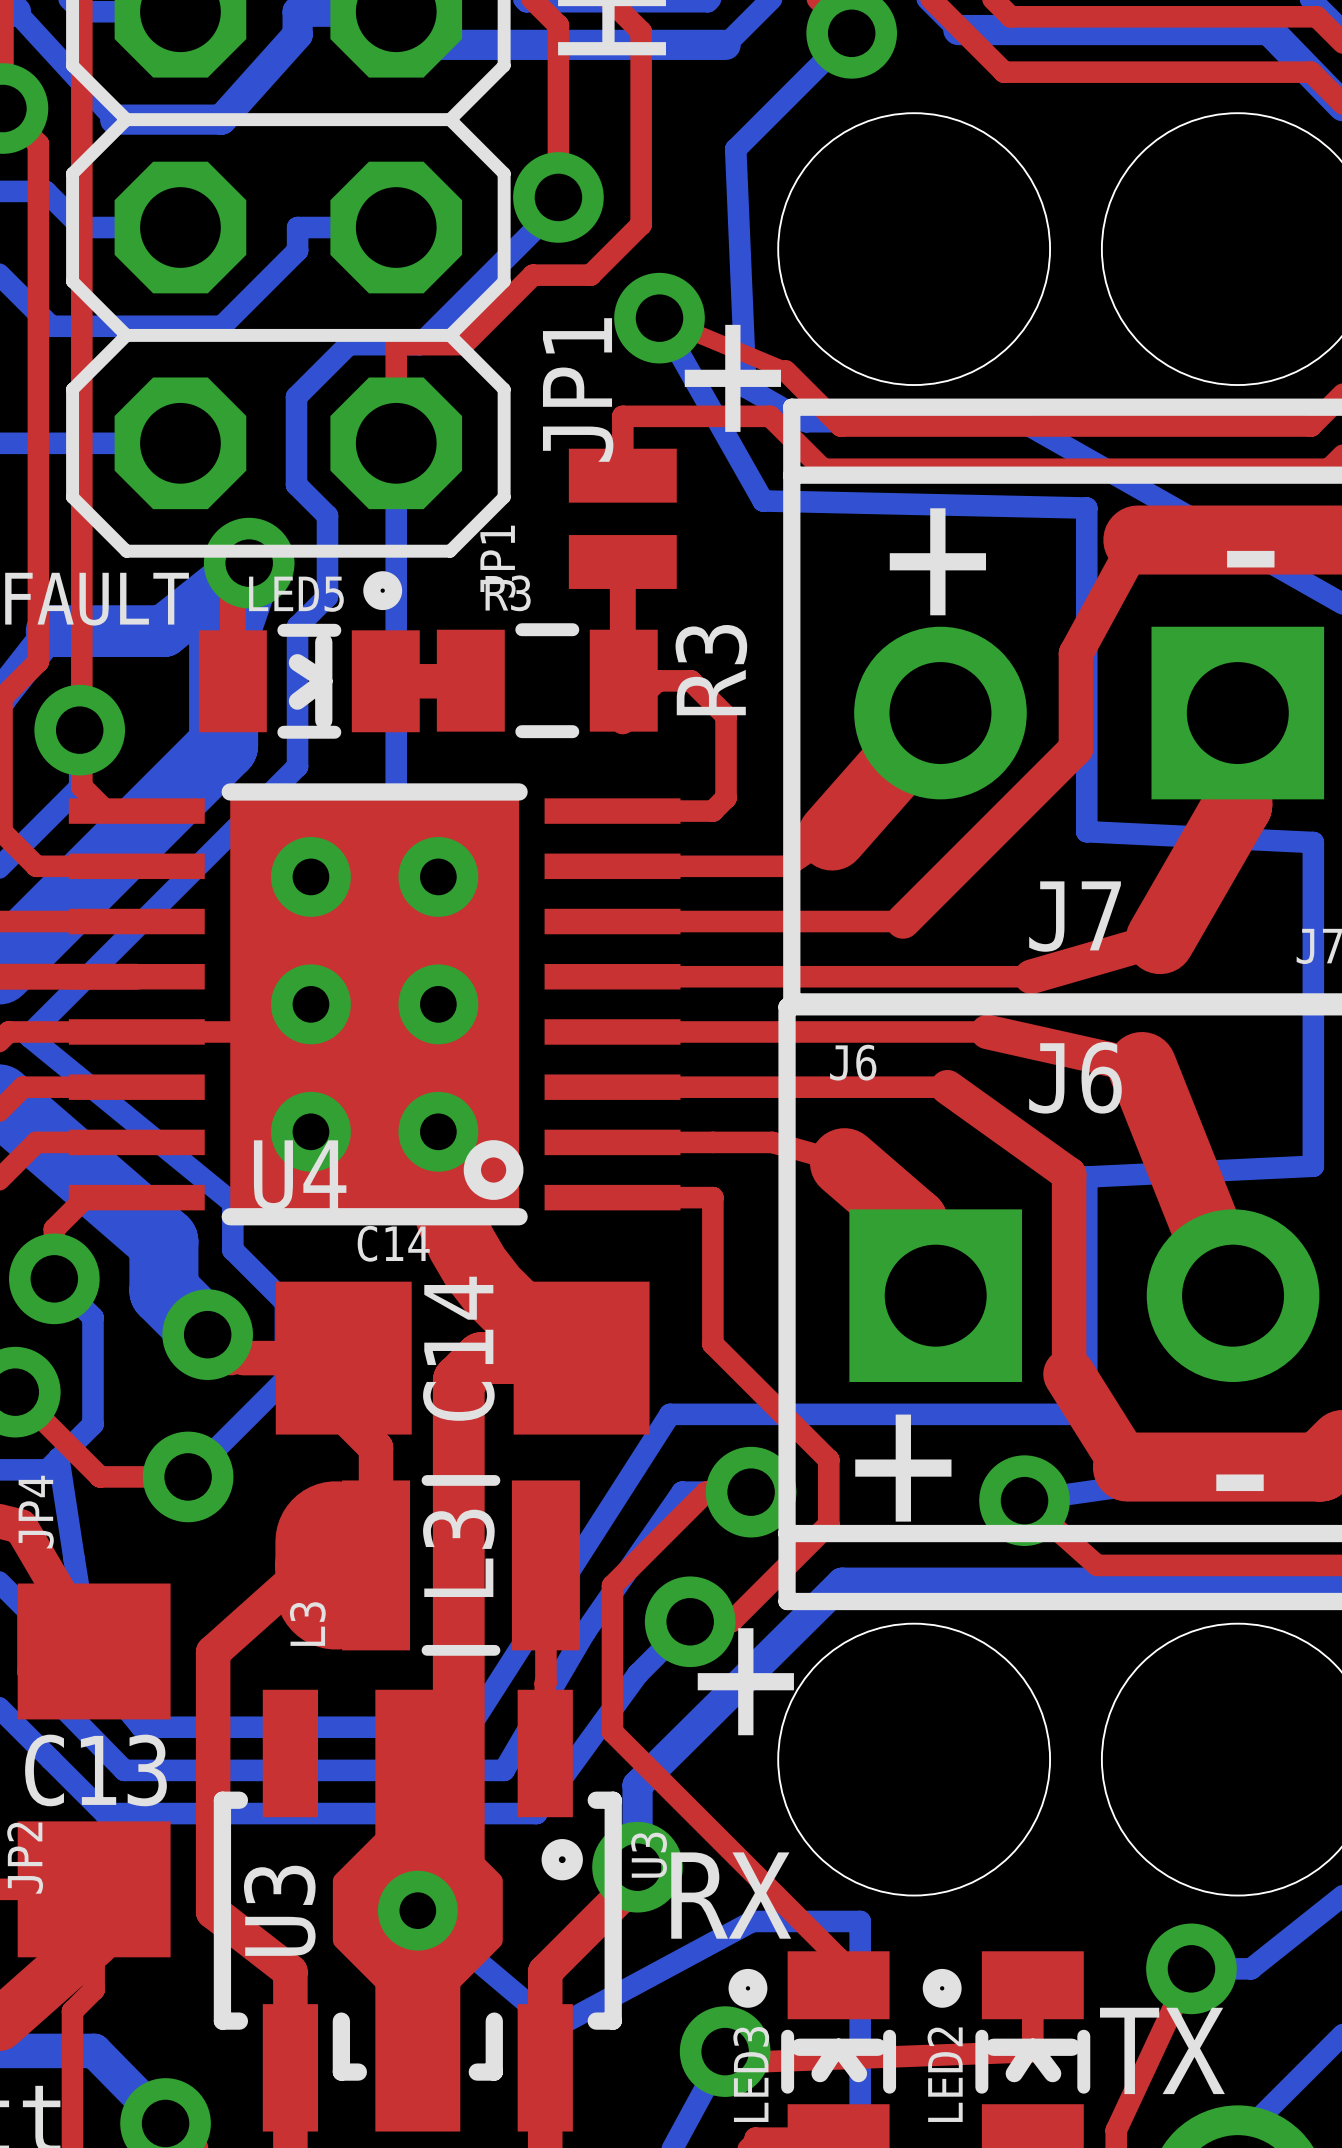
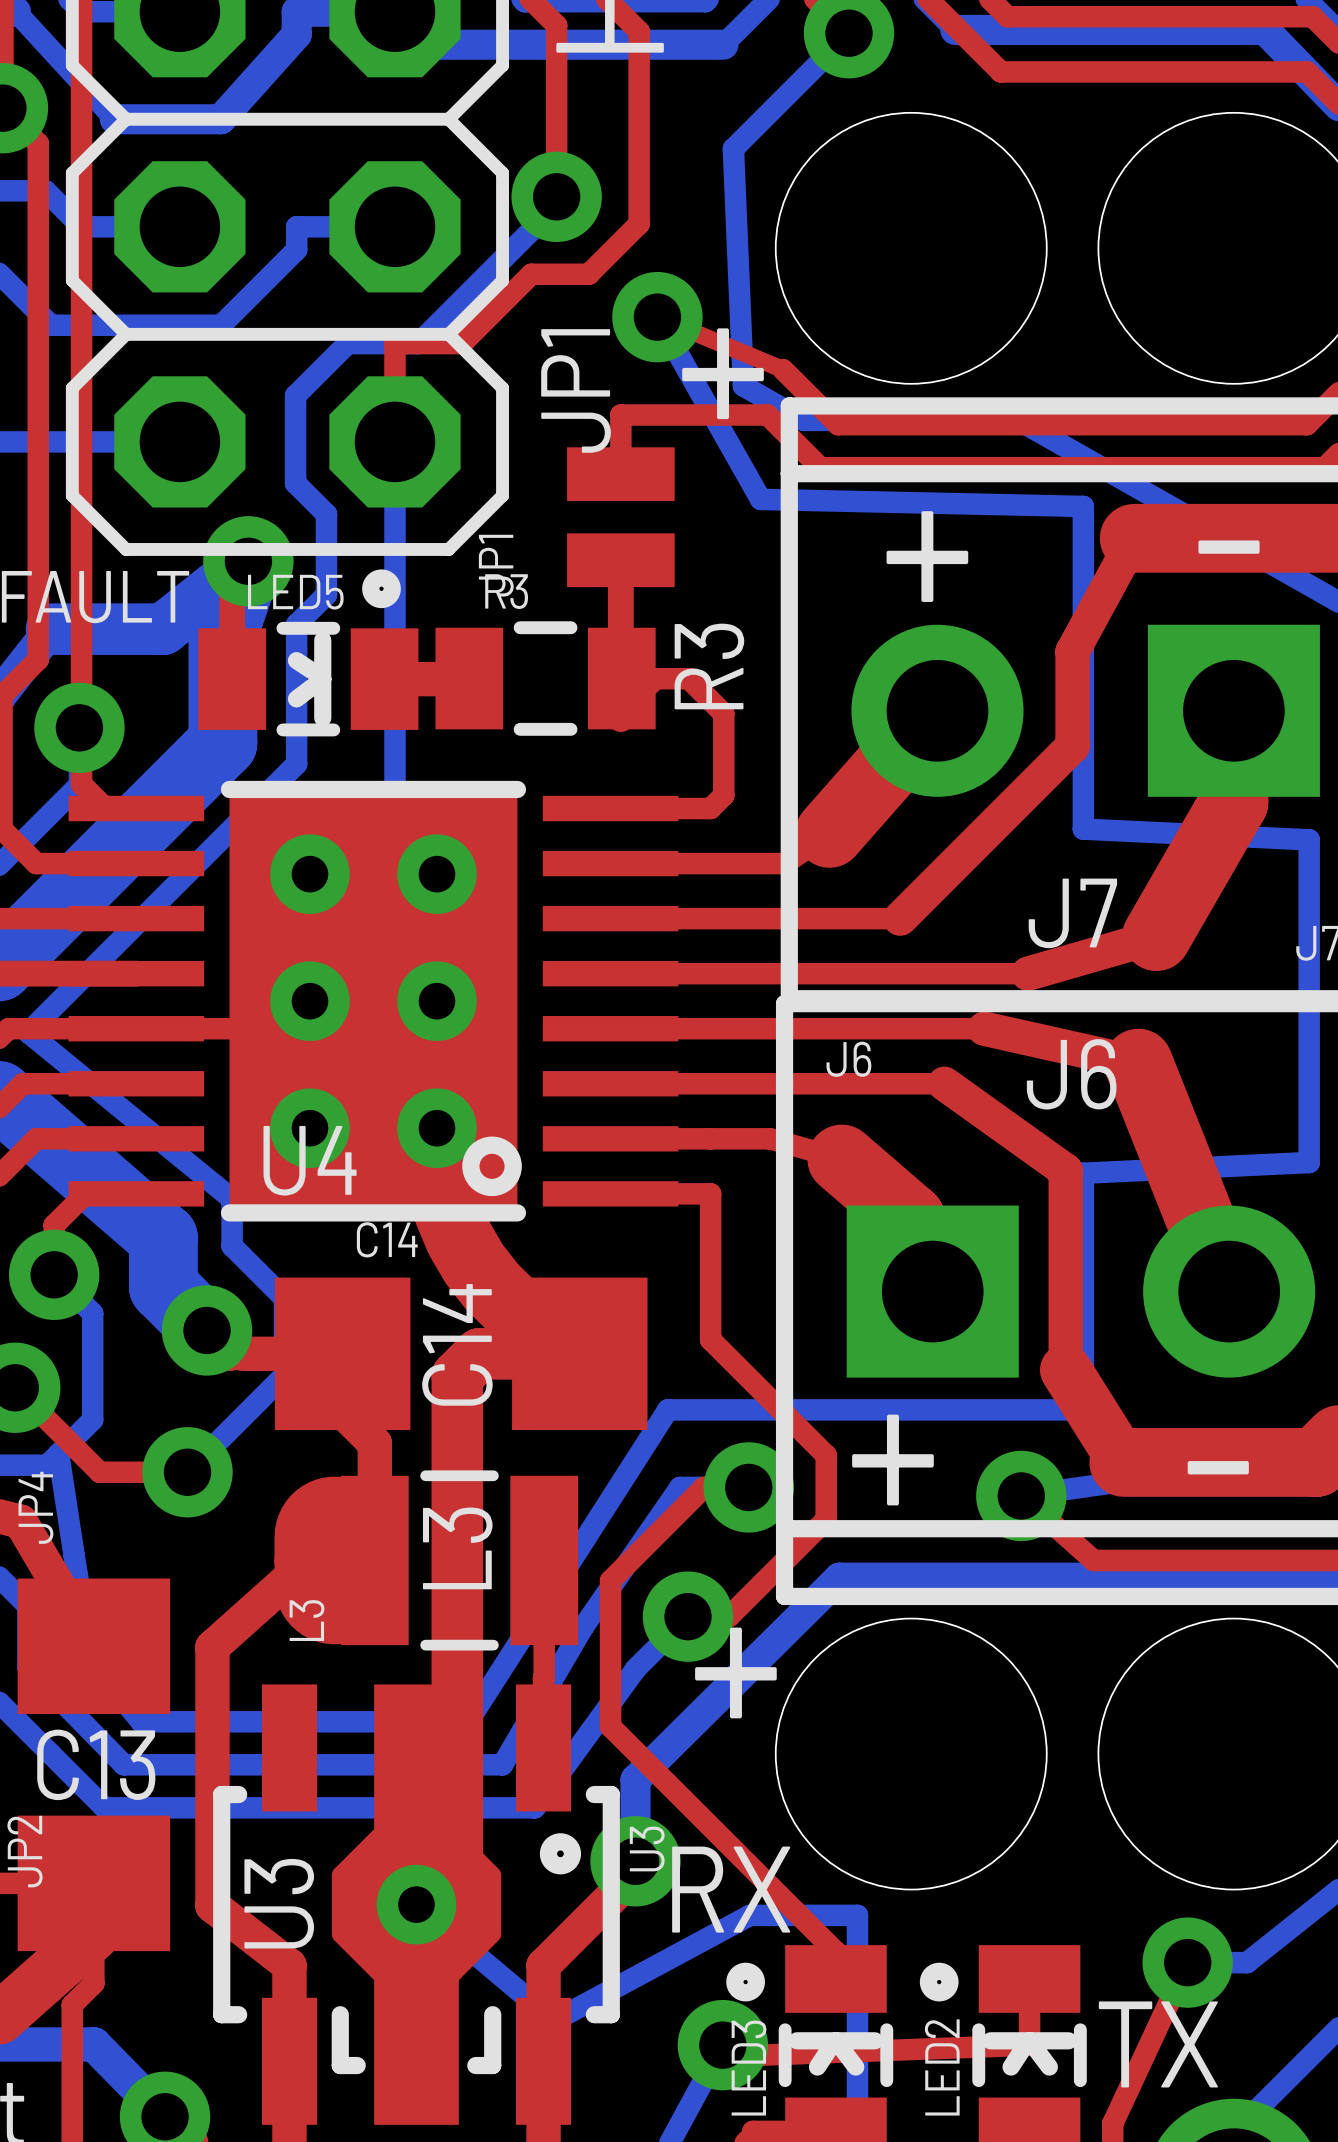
text position: U4 (300, 1175) -> U4 (310, 1160)

